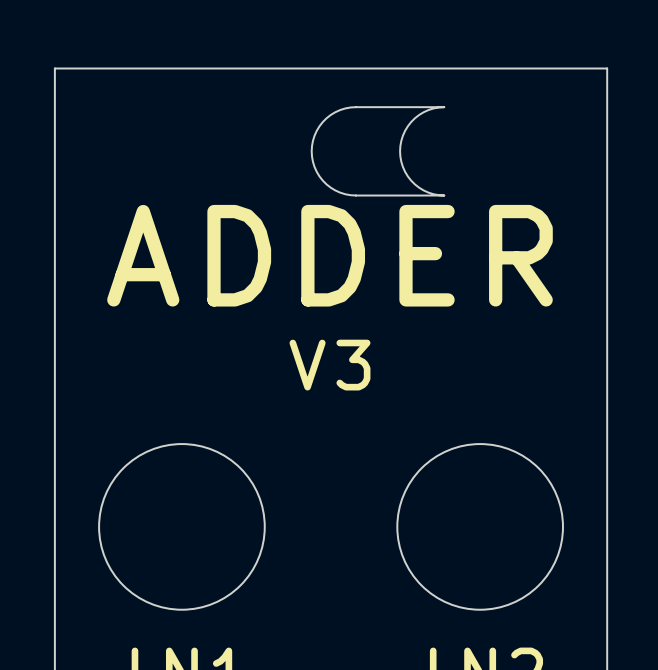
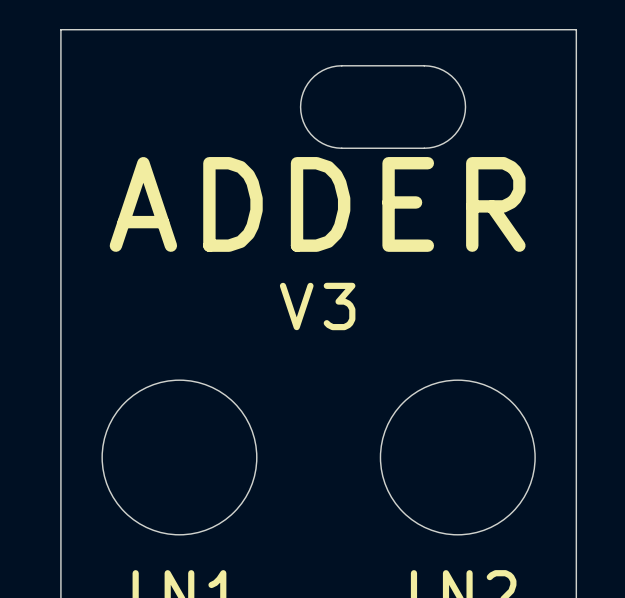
board edge: (444, 107) (428, 110) (414, 118) (402, 135) (400, 151) (402, 167) (411, 180) (423, 190) (444, 195) -> (424, 65) (438, 68) (451, 76) (460, 87) (465, 107) (462, 121) (455, 134) (443, 143) (424, 148)

